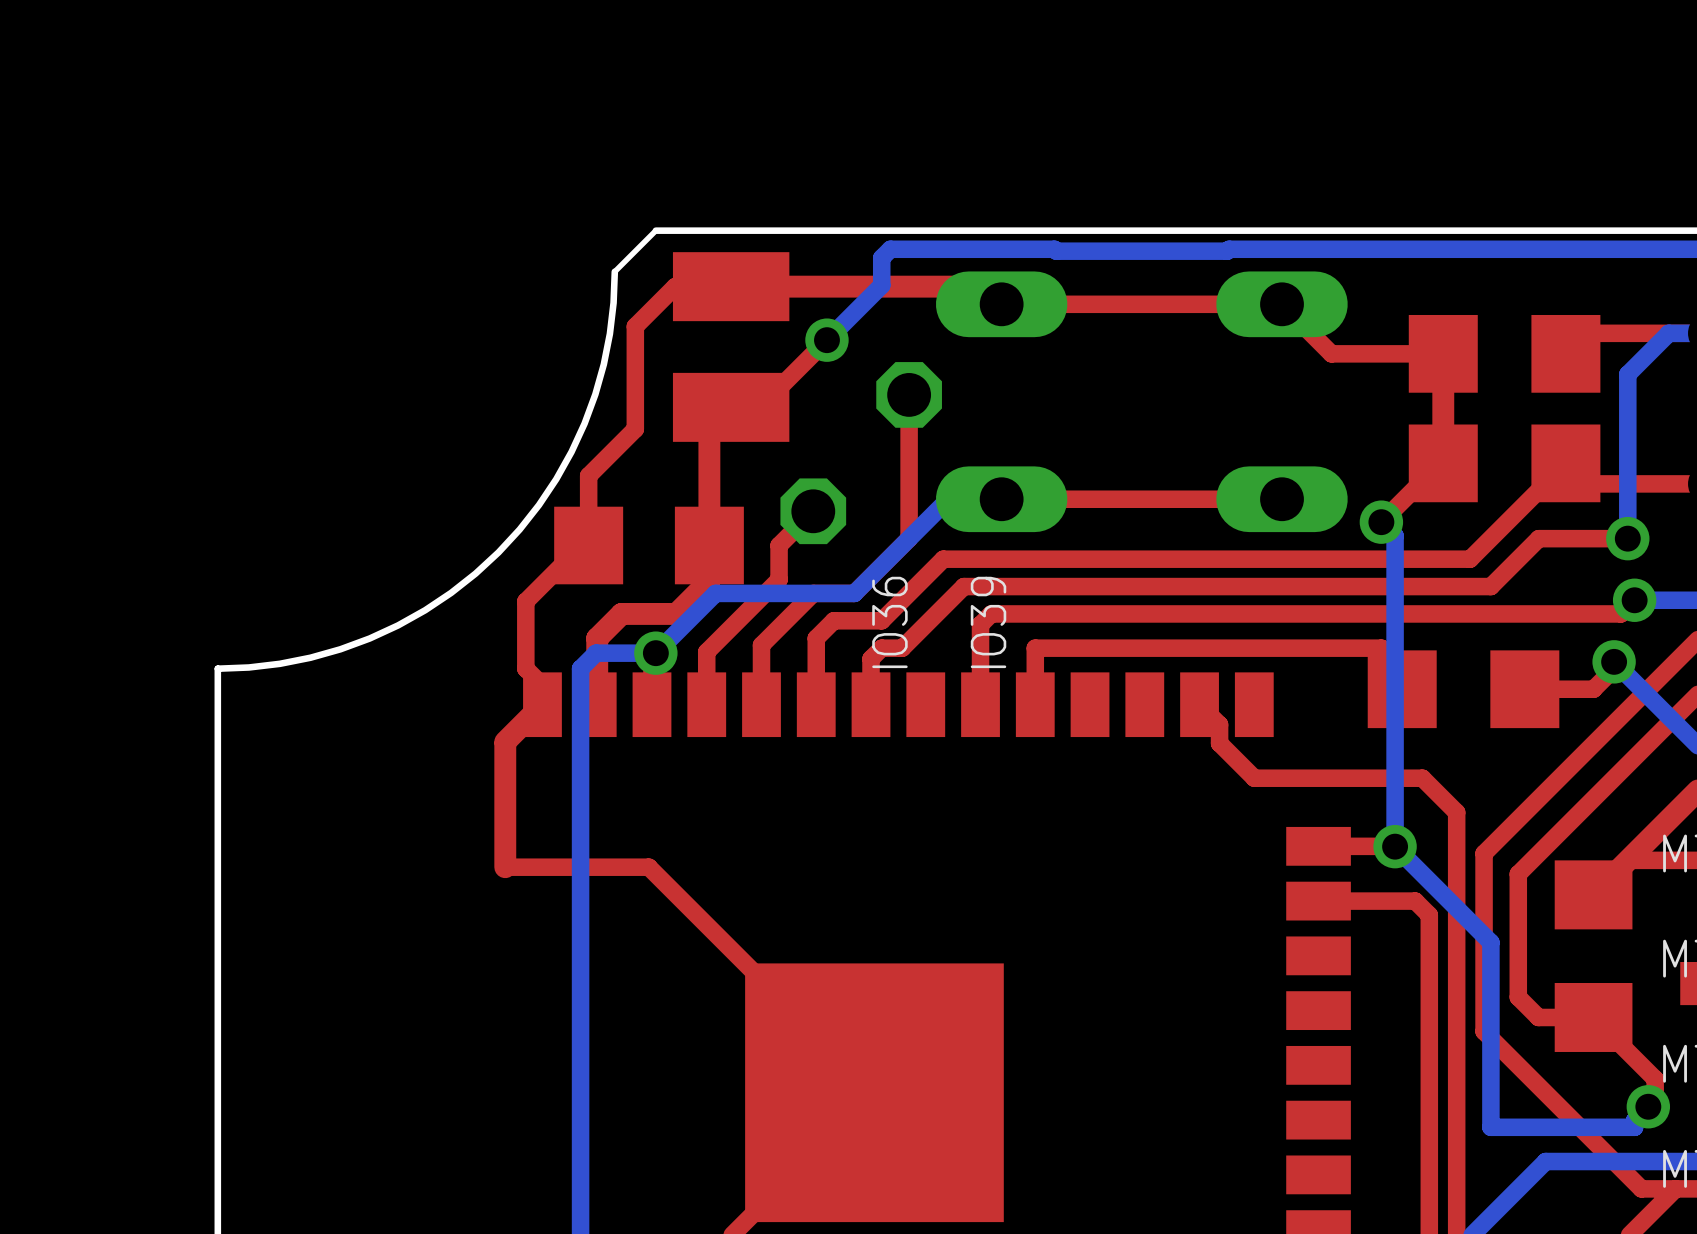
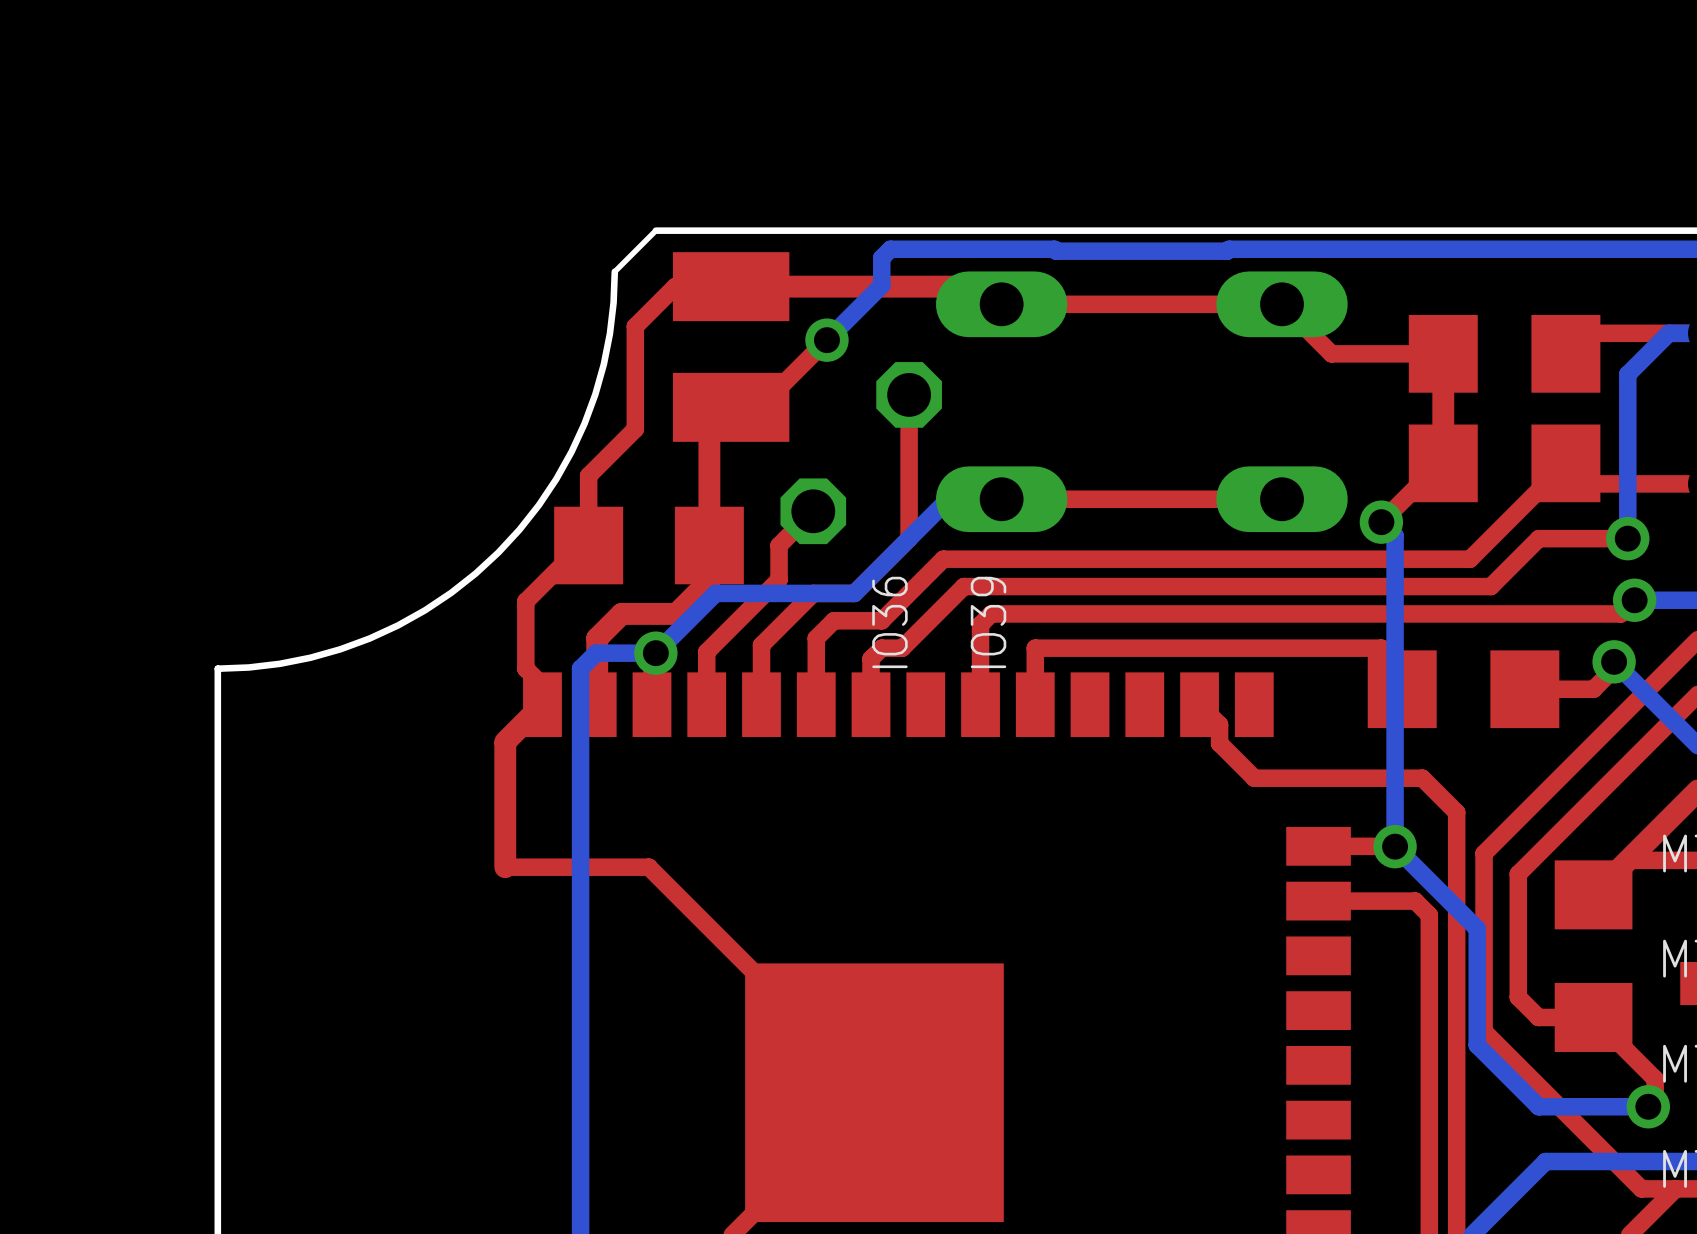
bottom track: (1477, 928) (1490, 942) (1490, 1127) (1634, 1127) (1634, 1120) (1648, 1106) -> (1477, 928) (1477, 1045) (1538, 1106) (1648, 1106)

